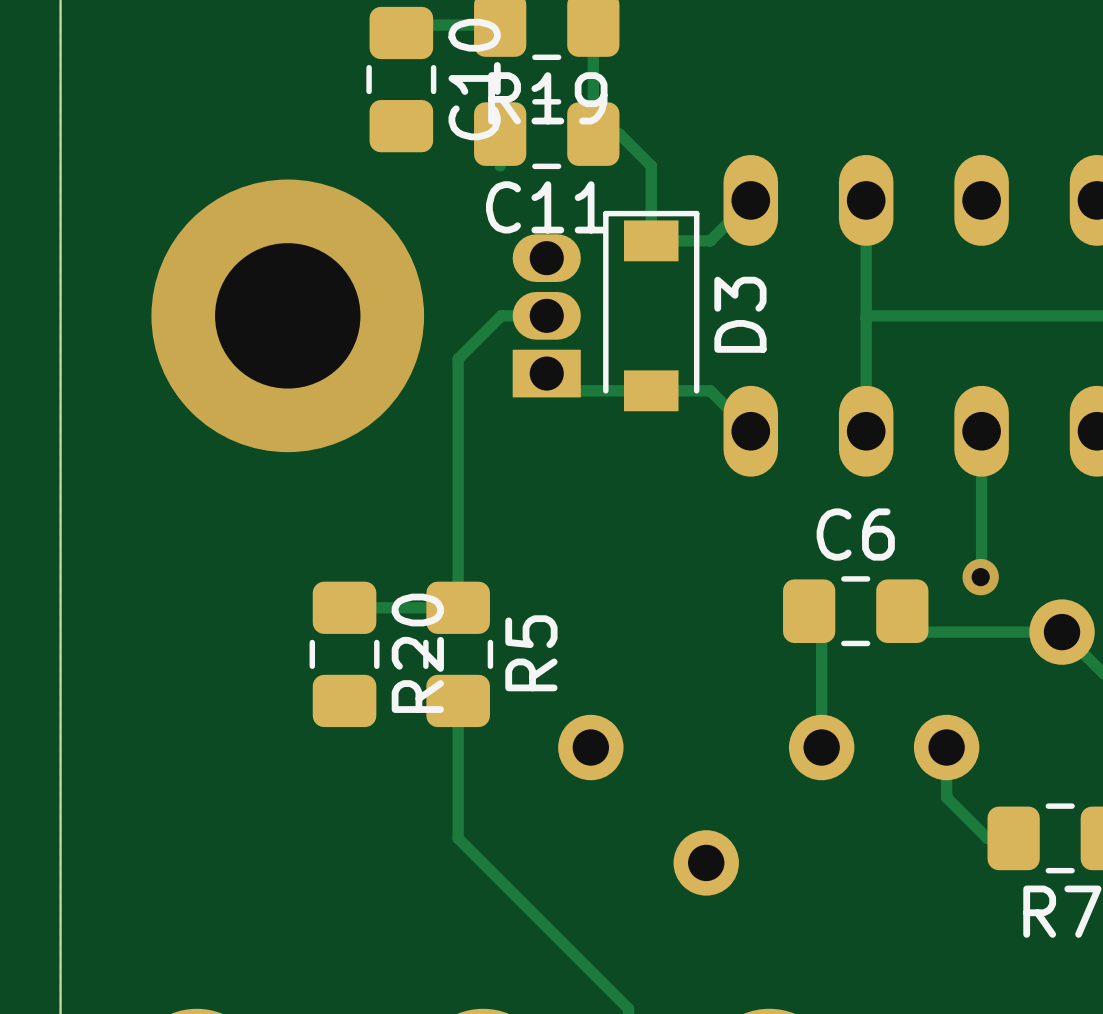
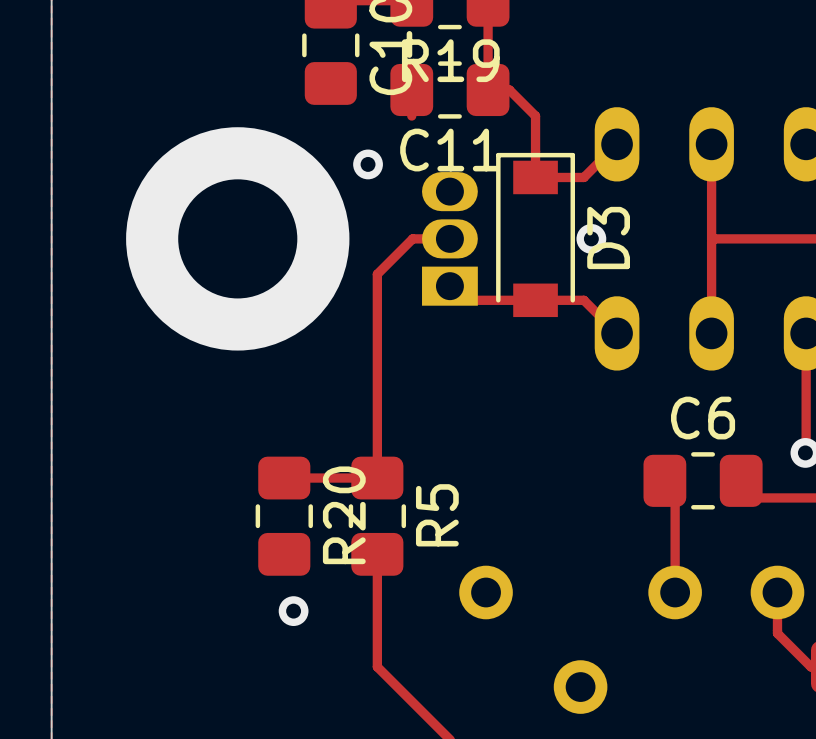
via: none -> (368, 164)
via: none -> (591, 238)
via: none -> (293, 611)

